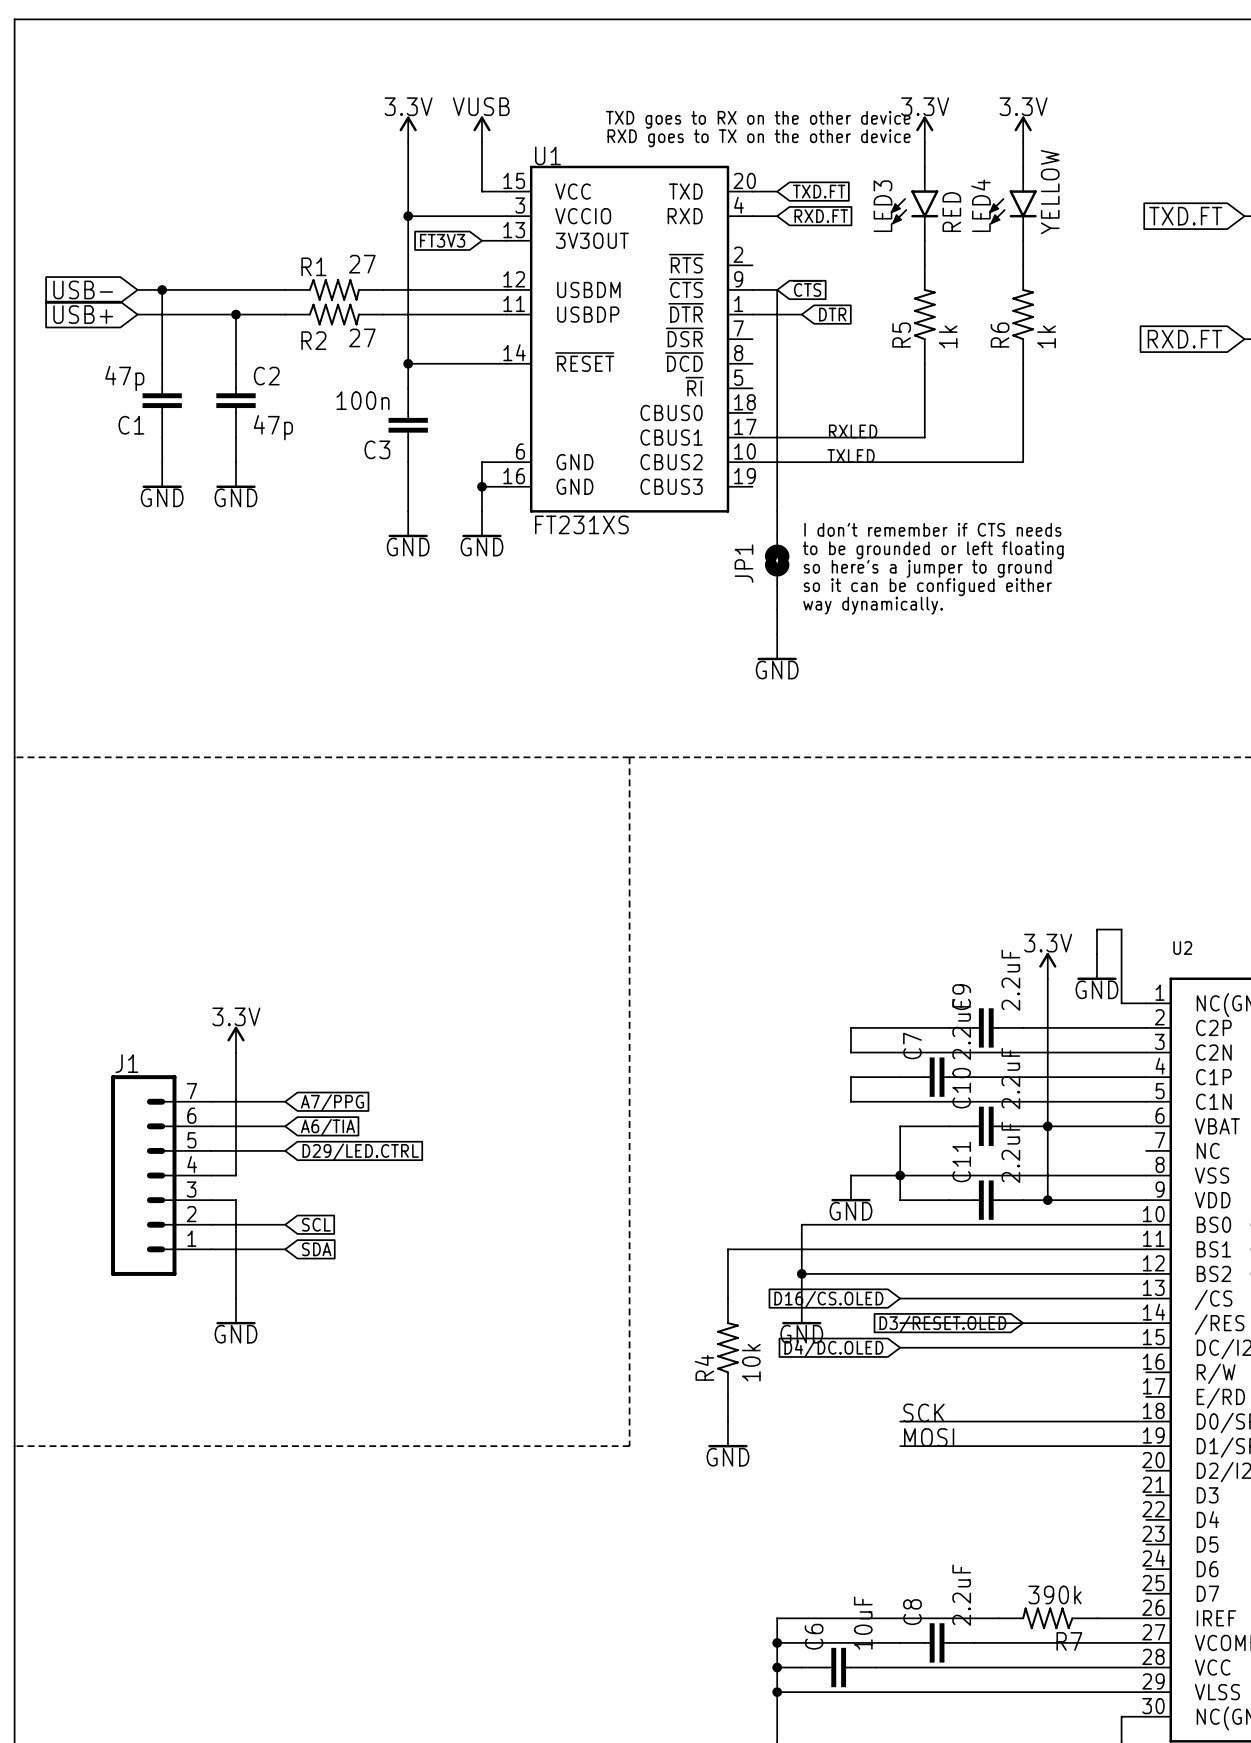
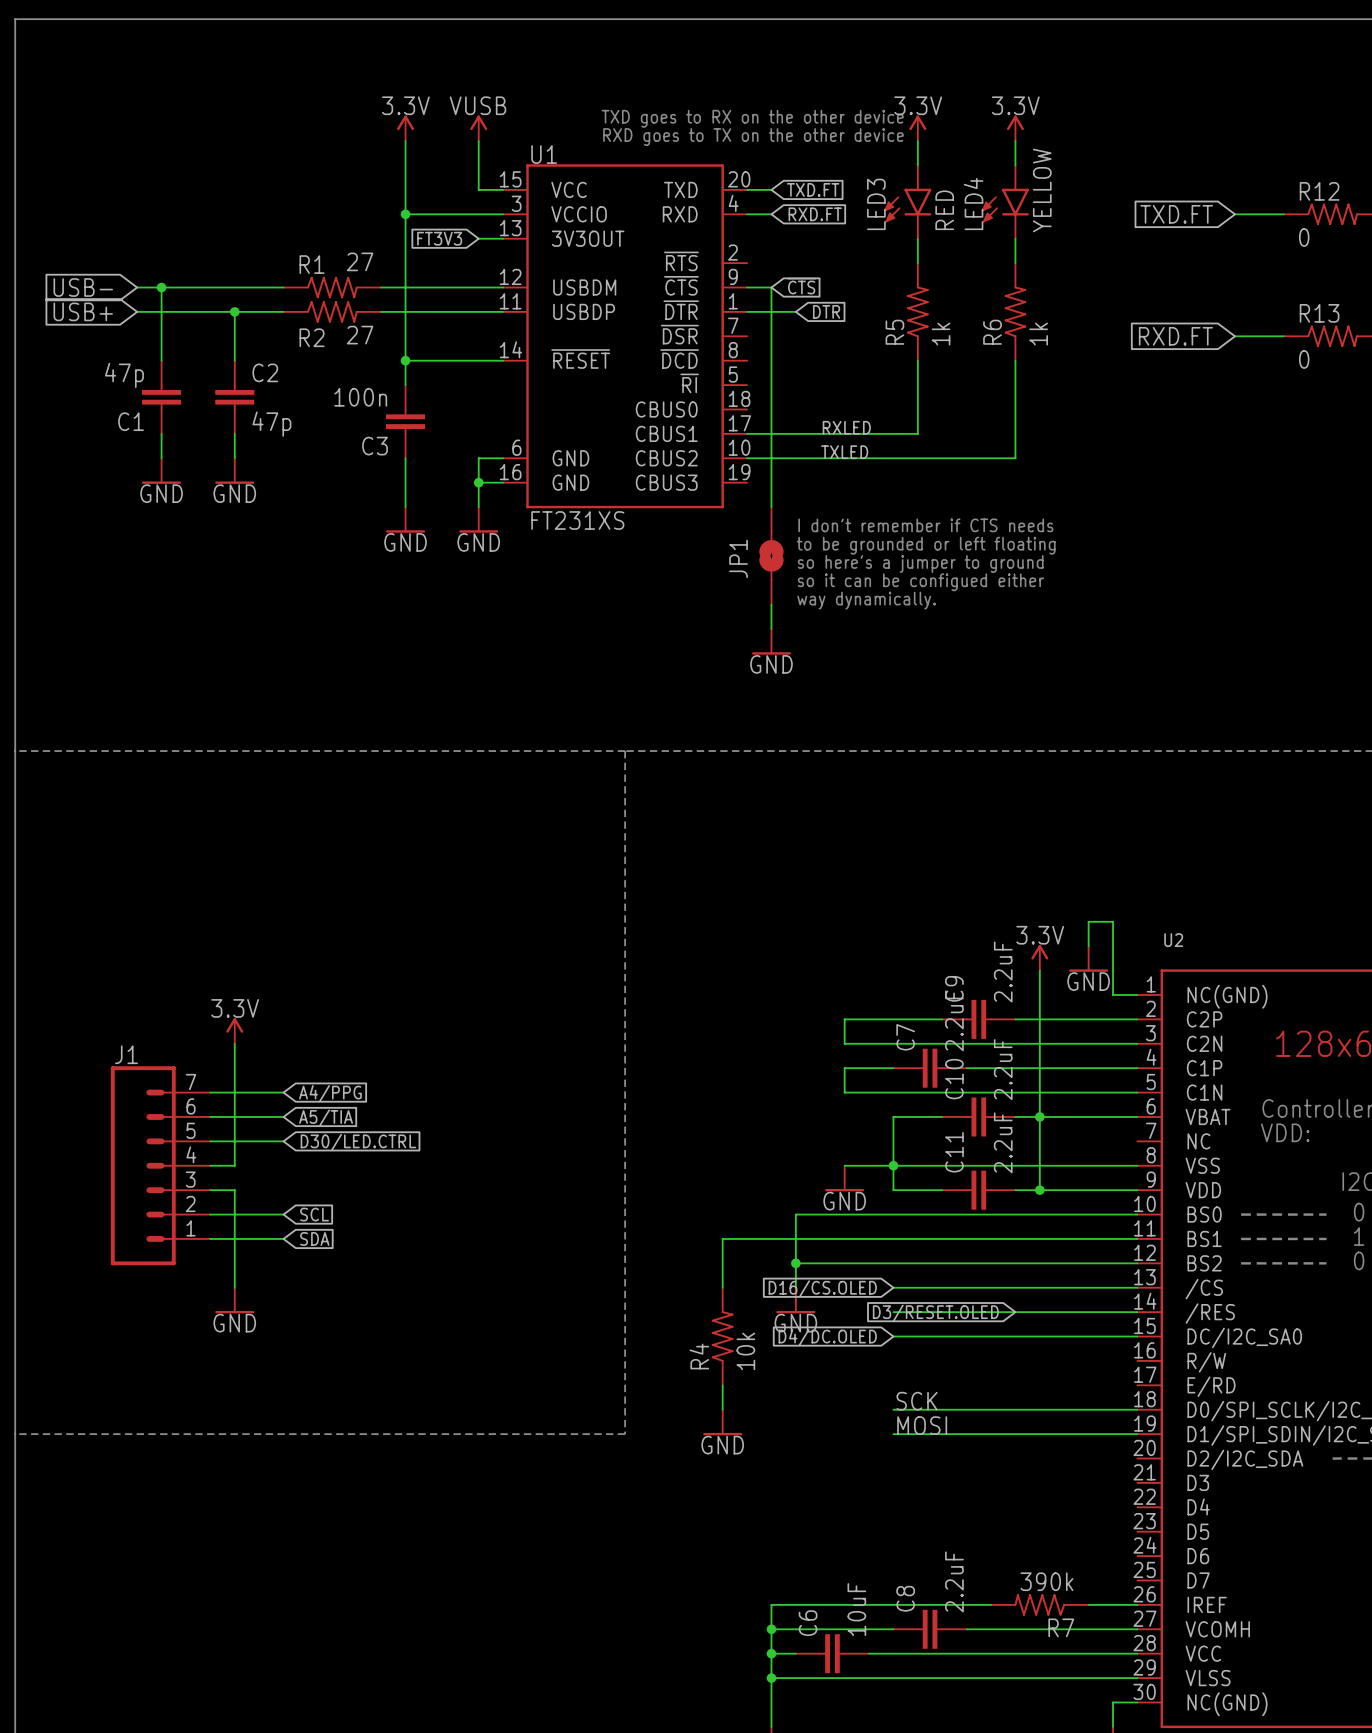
global label: A7/PPG (332, 1102) -> A4/PPG (330, 1093)
global label: A6/TIA (328, 1127) -> A5/TIA (326, 1118)
global label: D29/LED.CTRL (360, 1152) -> D30/LED.CTRL (358, 1142)

